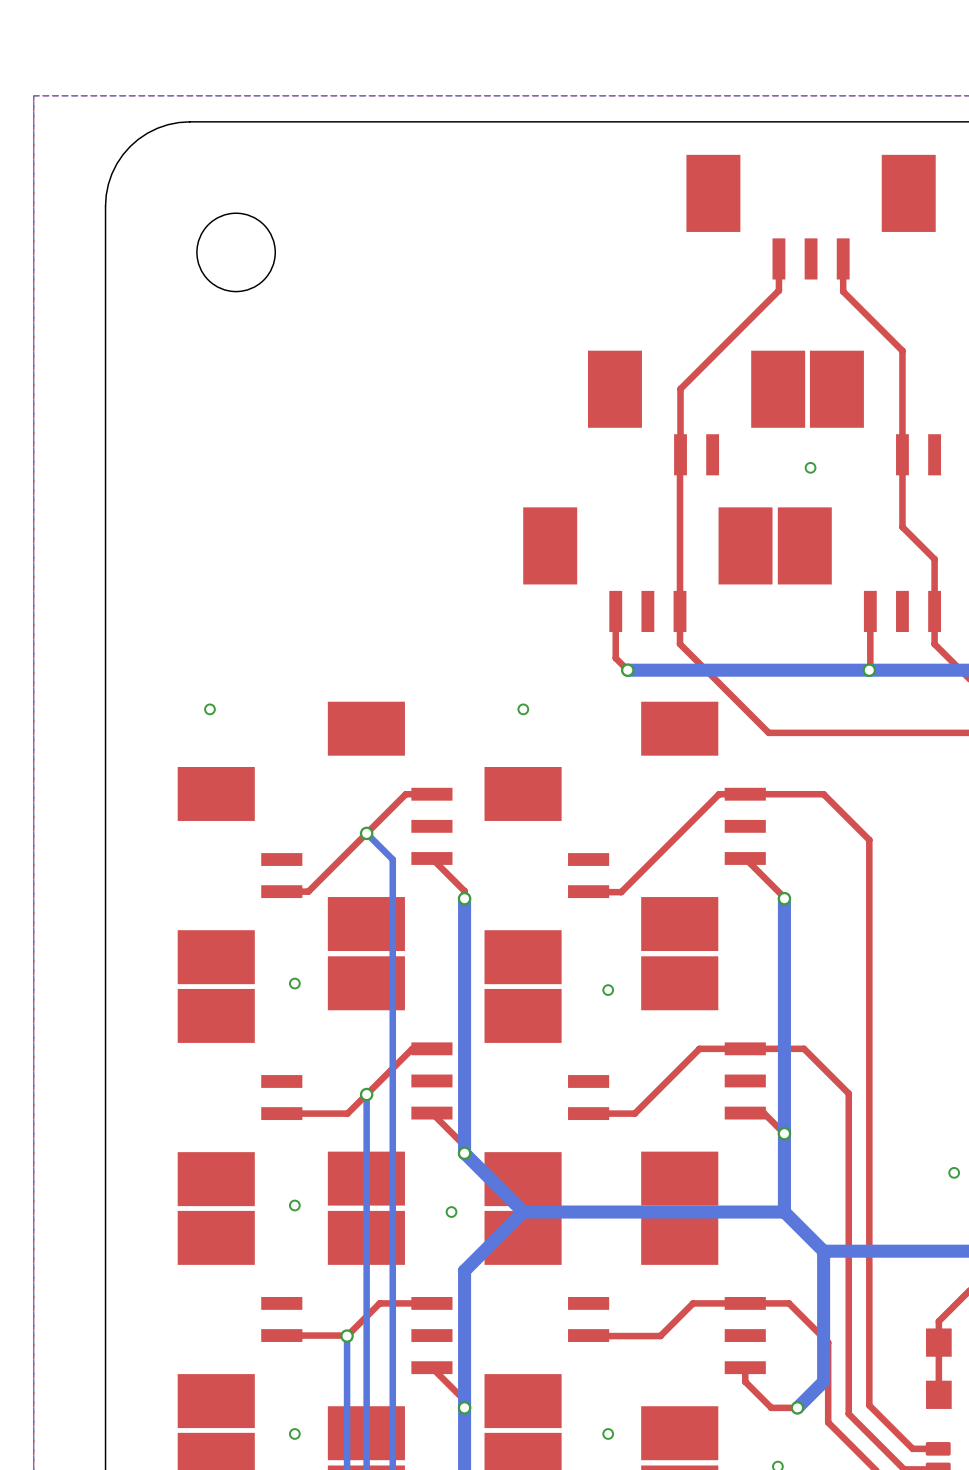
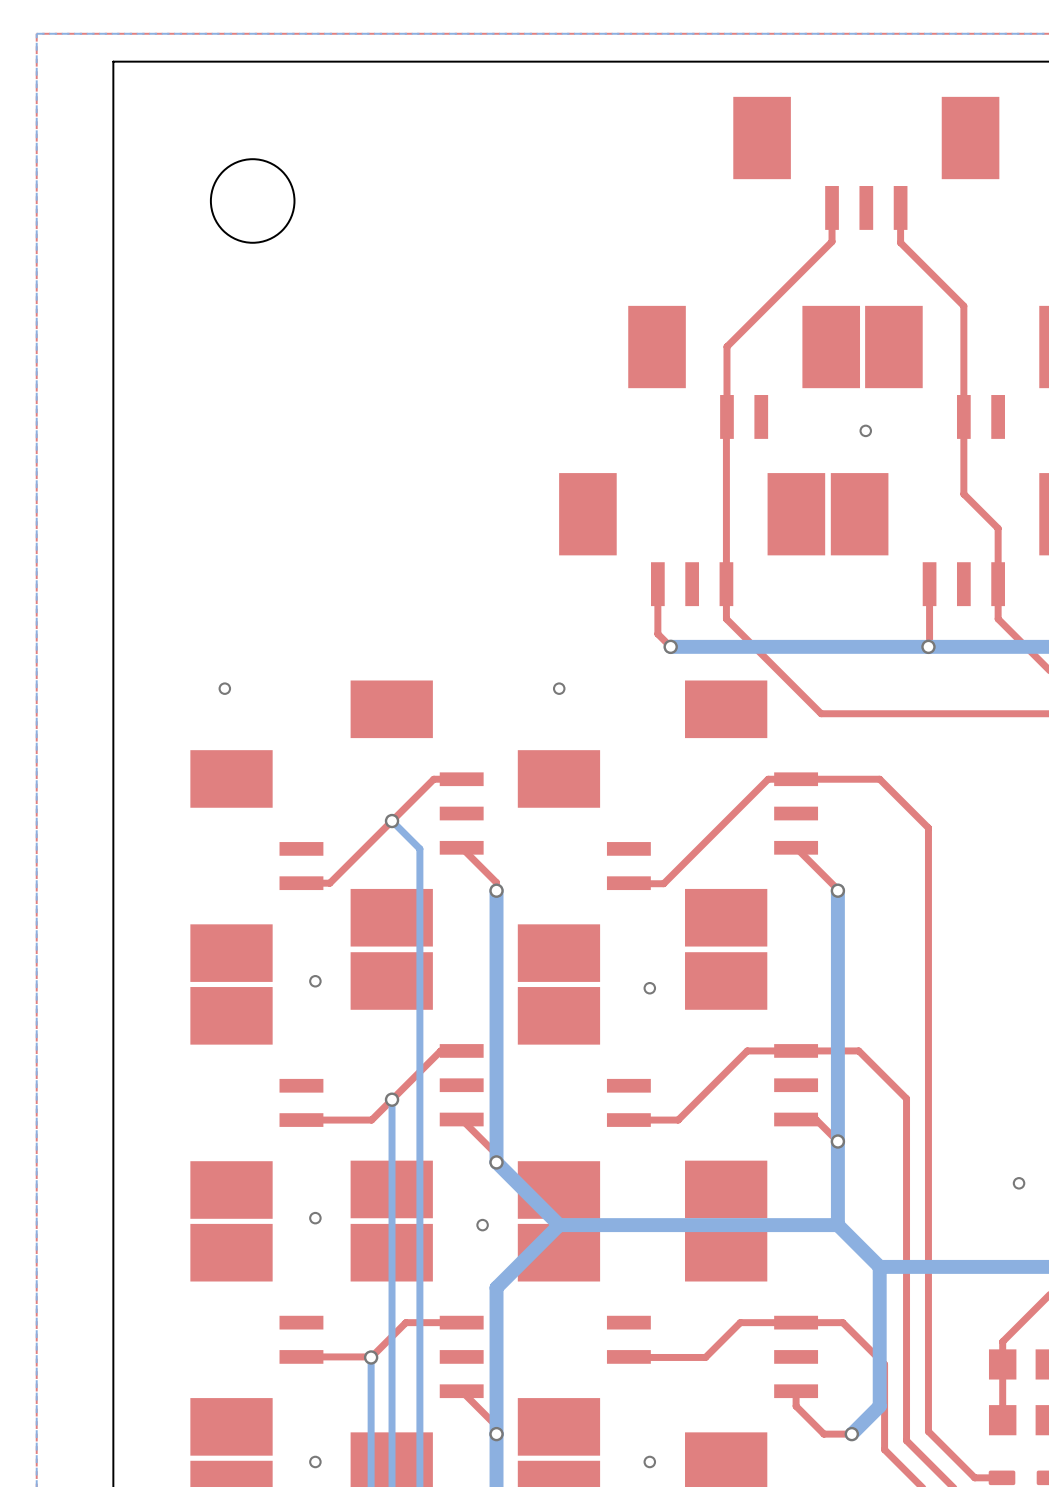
board edge: (189, 121) (157, 128) (130, 146) (111, 173) (105, 206) -> (203, 61) (113, 61) (113, 151)

